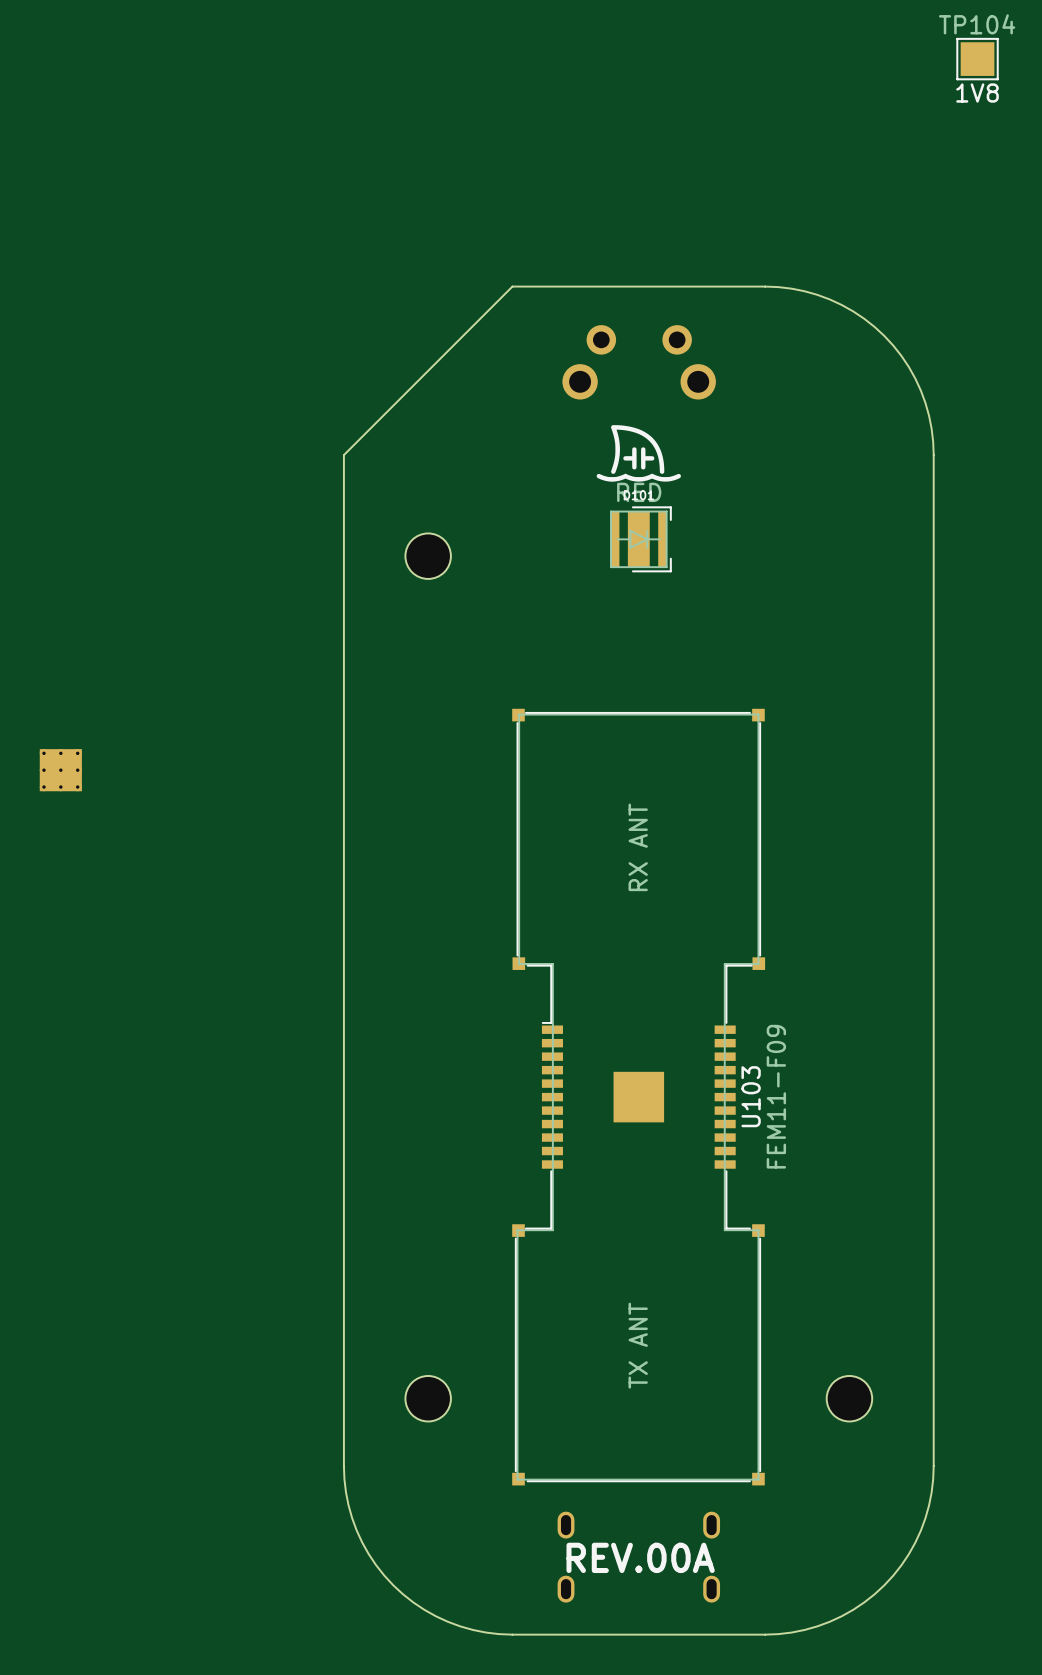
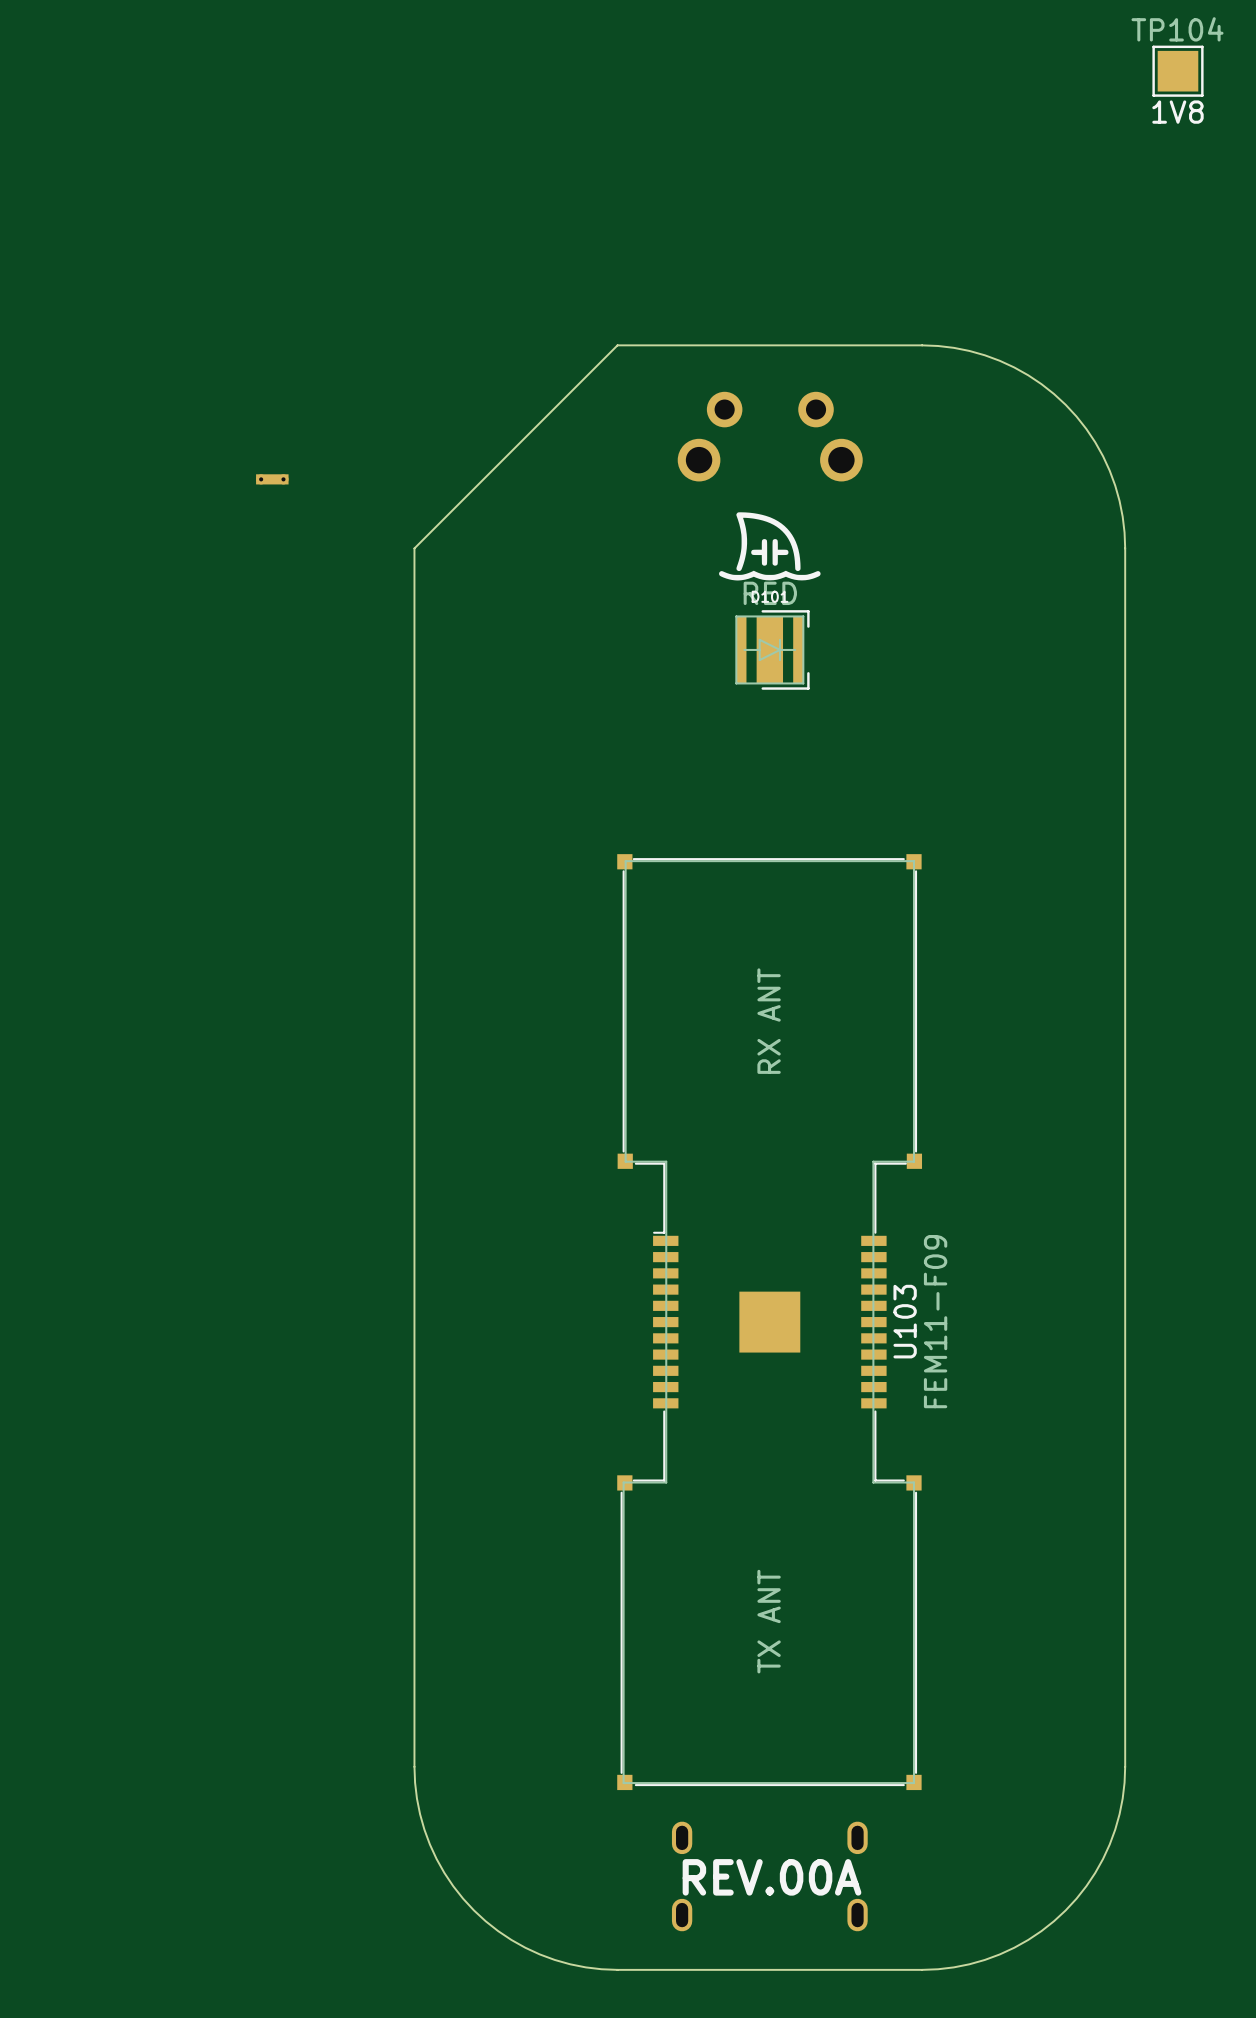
part: none -> (272, 479)
part: (428, 556) -> none
part: (60, 770) -> none
part: (428, 1398) -> none
part: (849, 1398) -> none

